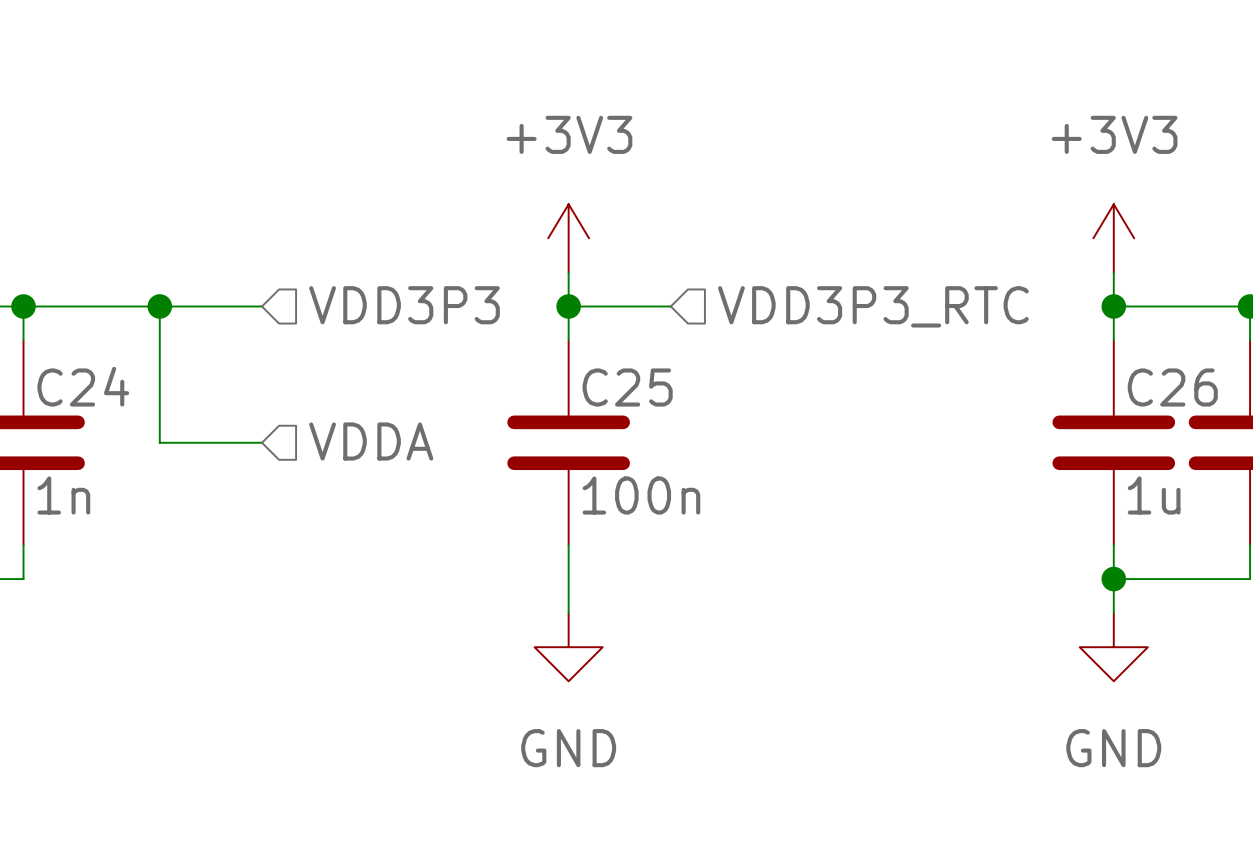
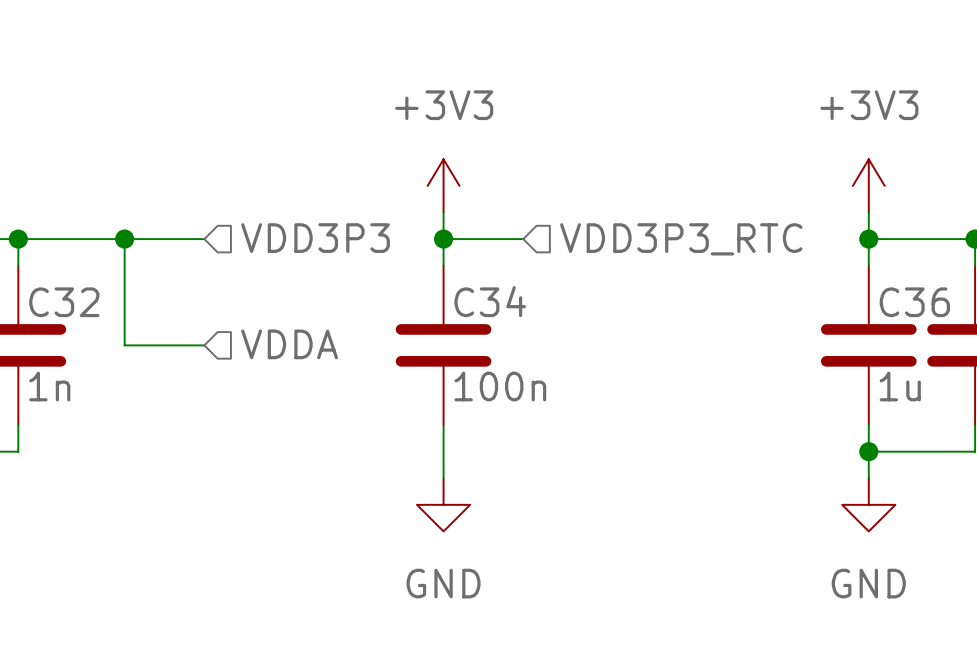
C24 name: C24 (83, 386) -> C32 (64, 302)
C25 name: C25 (627, 387) -> C34 (490, 301)
C26 name: C26 (1172, 387) -> C36 (914, 302)

